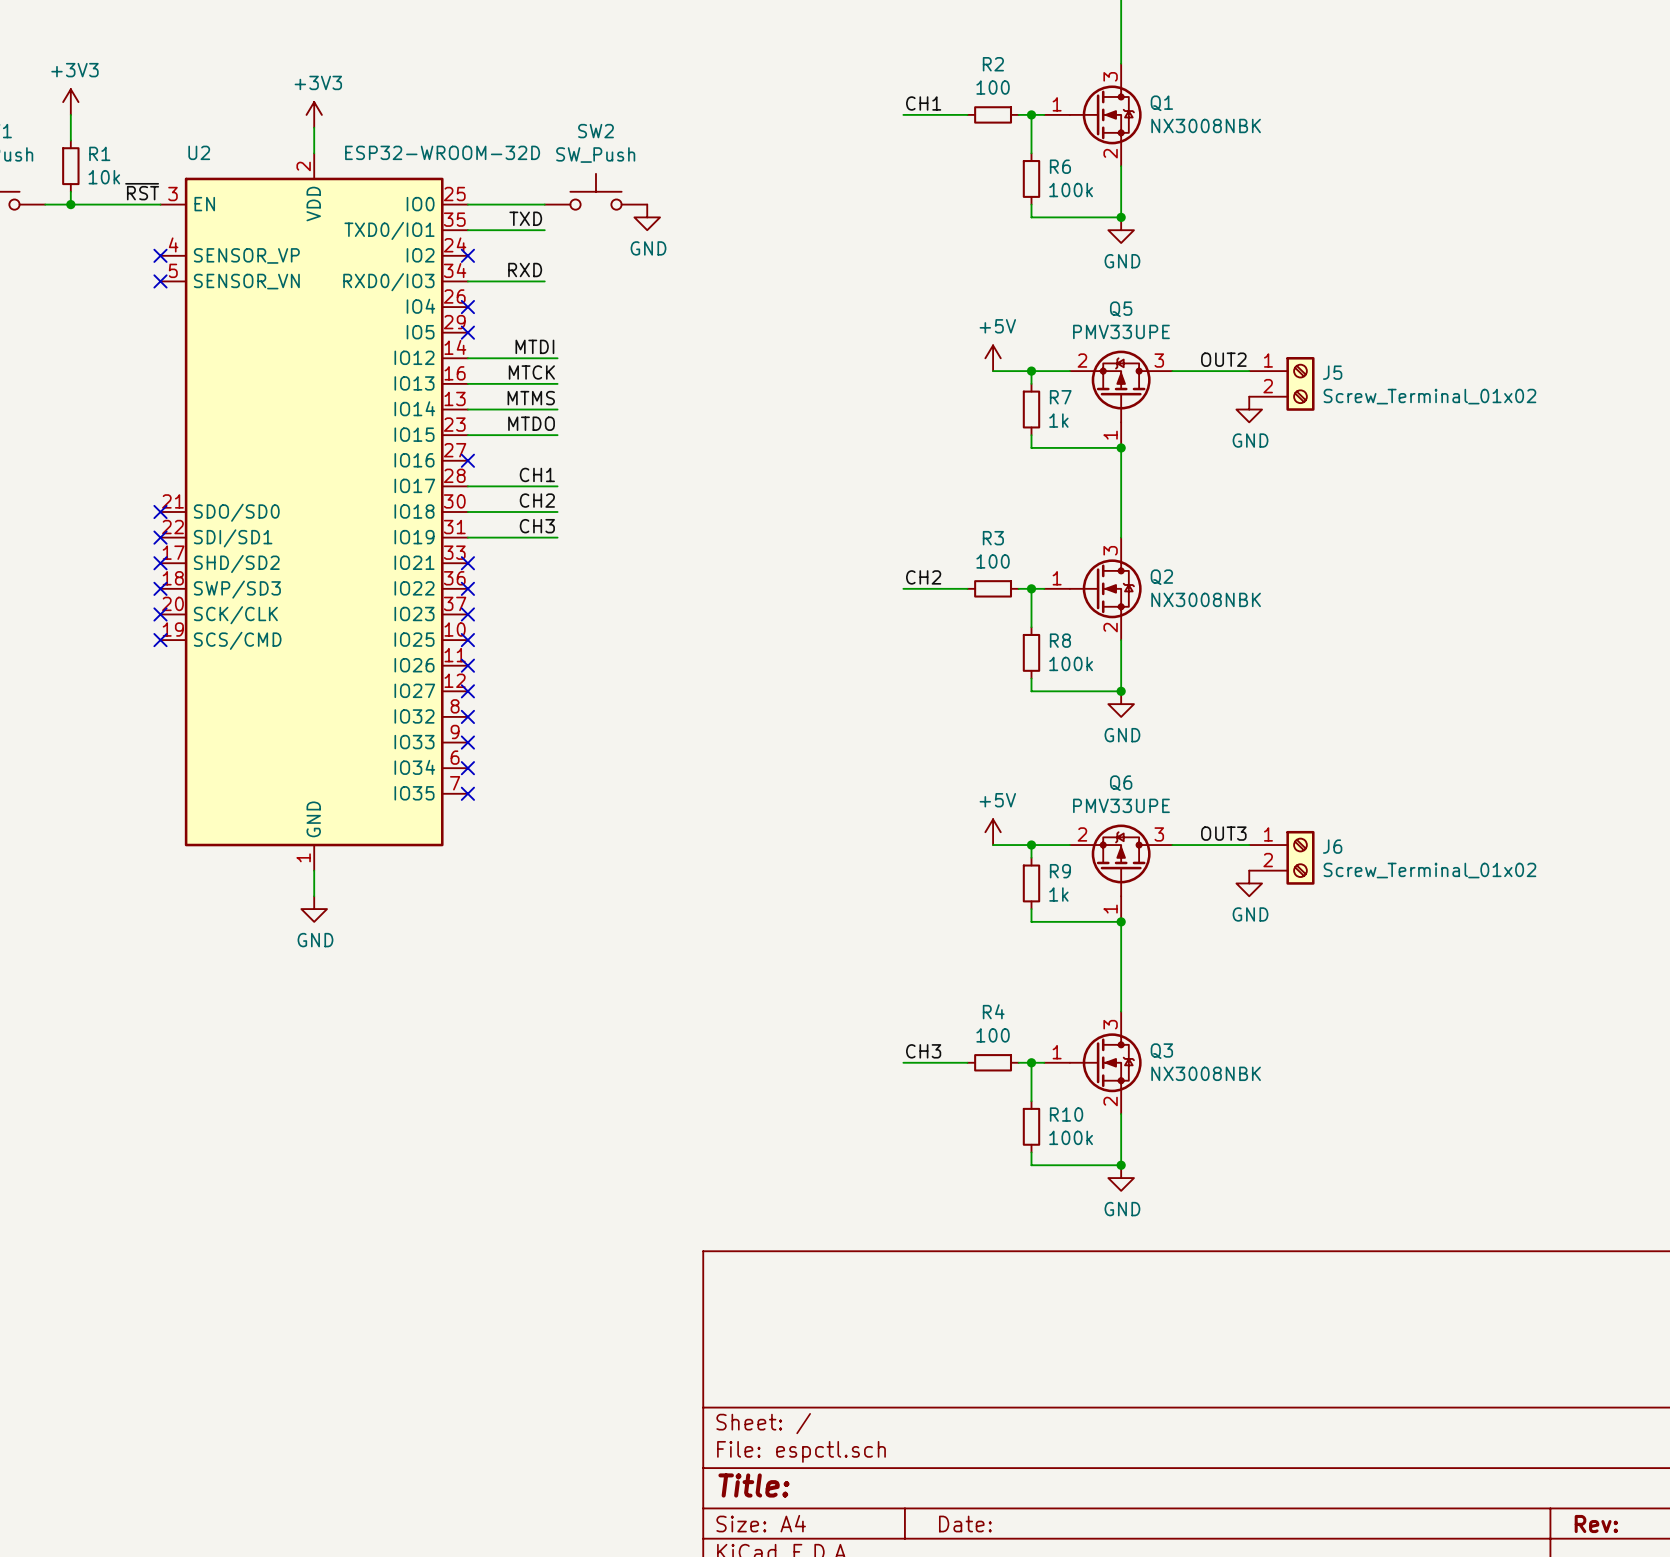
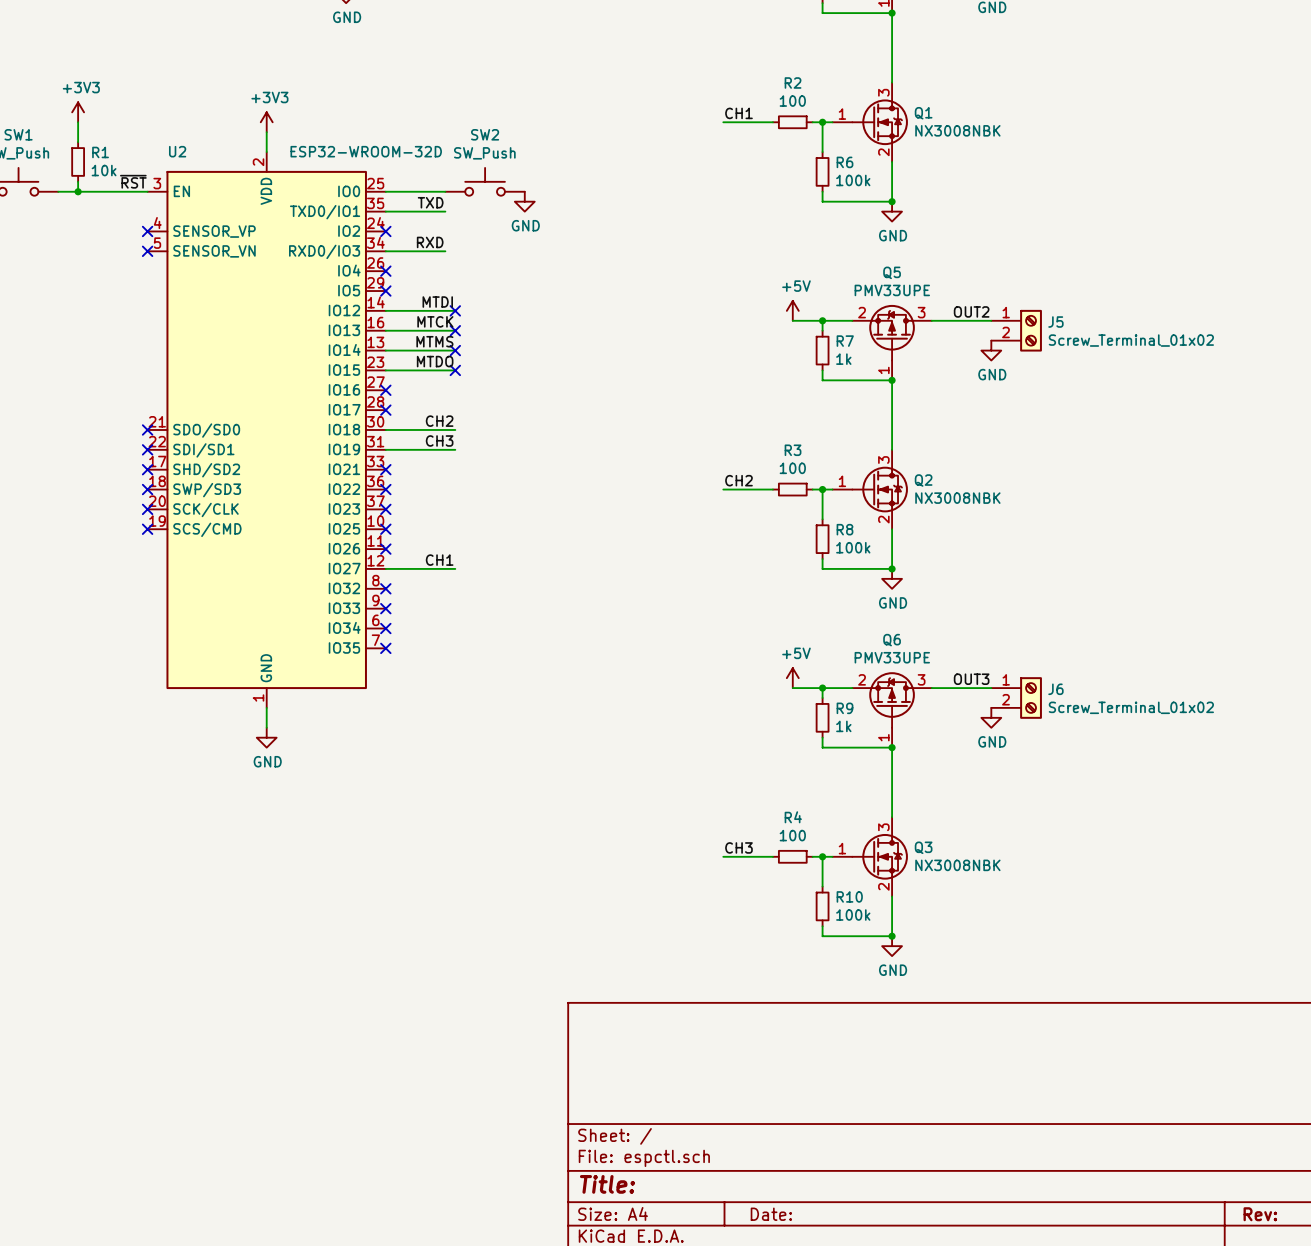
no-connect mark: none -> (455, 310)
no-connect mark: none -> (455, 330)
no-connect mark: none -> (455, 350)
no-connect mark: none -> (455, 370)
label position: CH1 (537, 474) -> CH1 (439, 560)
wire: (467, 486) (557, 486) -> (385, 568) (455, 568)
no-connect mark: none -> (385, 410)
no-connect mark: (467, 691) -> none

